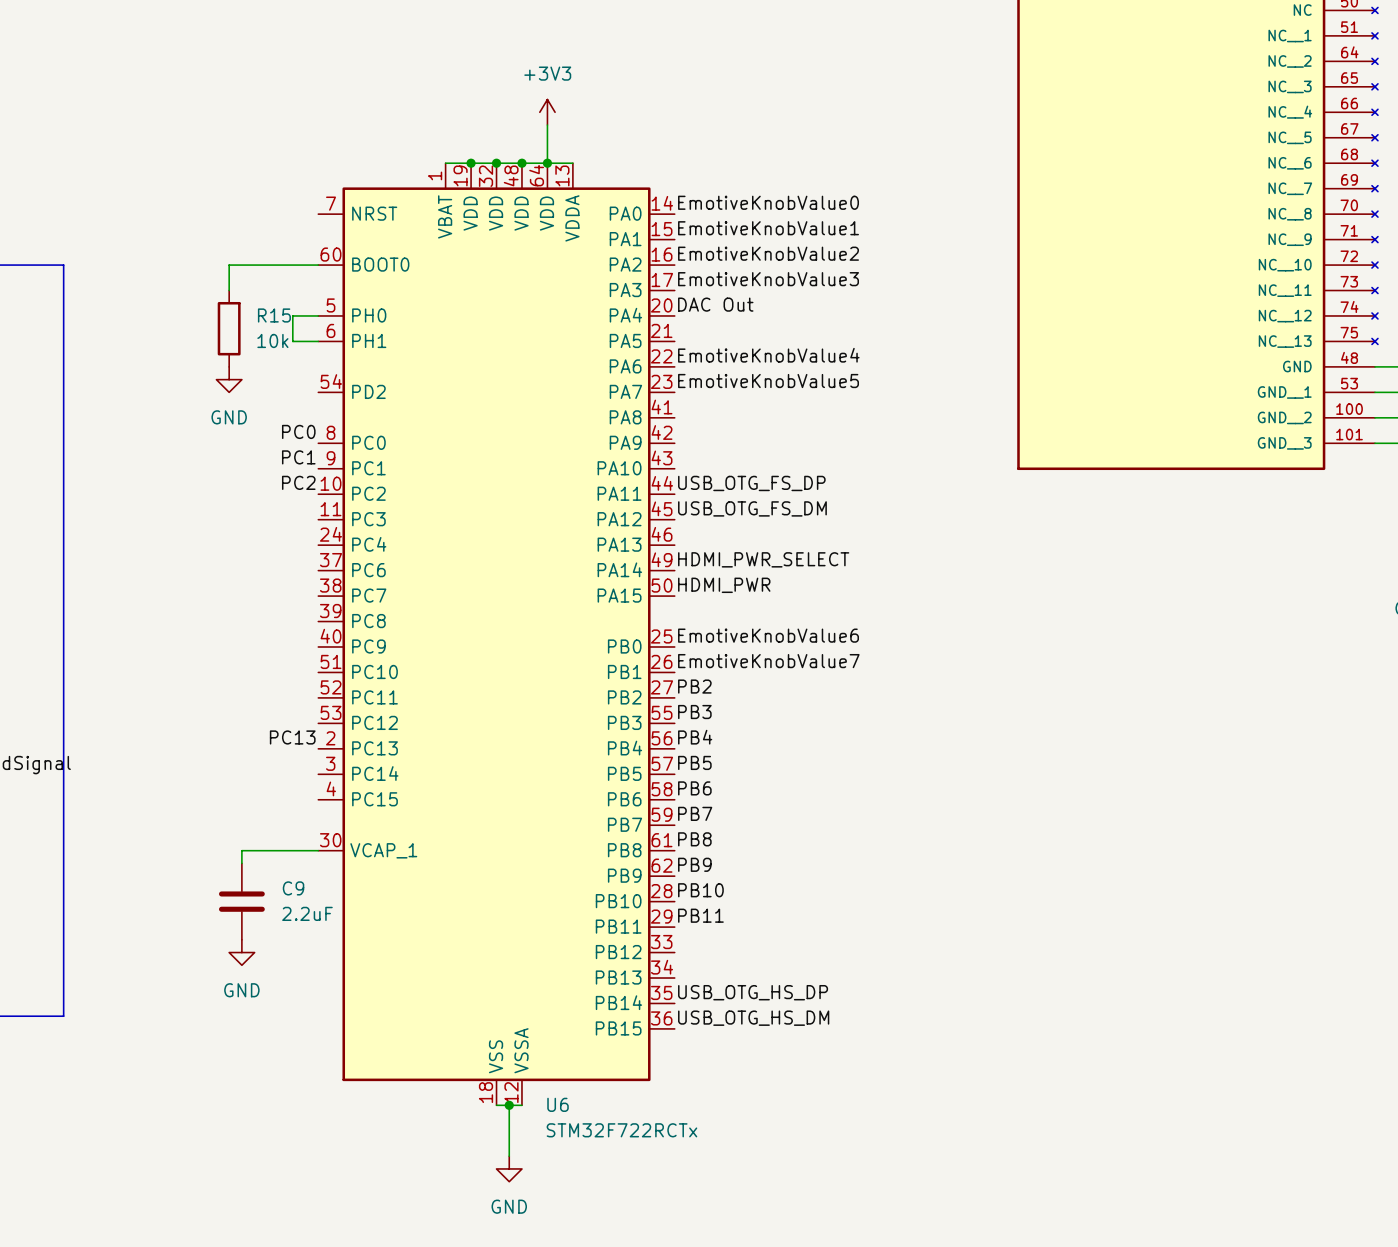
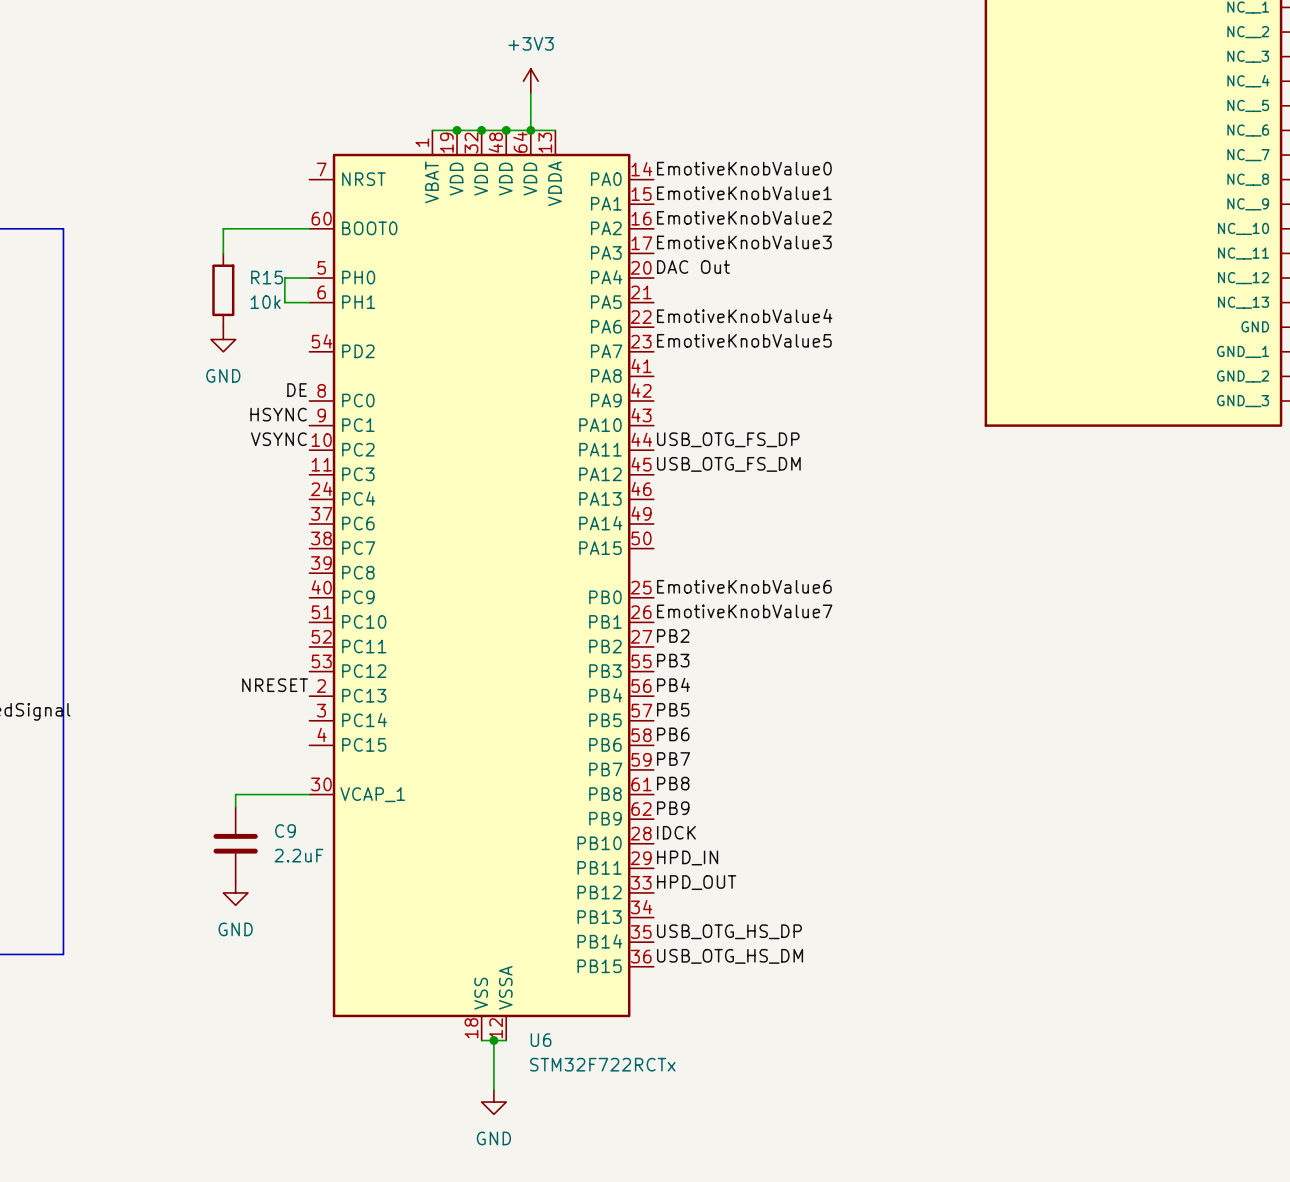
label: PC0 (298, 431) -> DE (297, 390)
label: PC1 (298, 457) -> HSYNC (278, 414)
label: PC2 (298, 482) -> VSYNC (278, 439)
label: HDMI_PWR_SELECT (763, 559) -> none
label: HDMI_PWR (724, 585) -> none
label: PC13 (292, 737) -> NRESET (275, 685)
label: PB10 (700, 890) -> IDCK (676, 832)
label: PB11 (700, 915) -> HPD_IN (687, 857)
label: none -> HPD_OUT (696, 882)

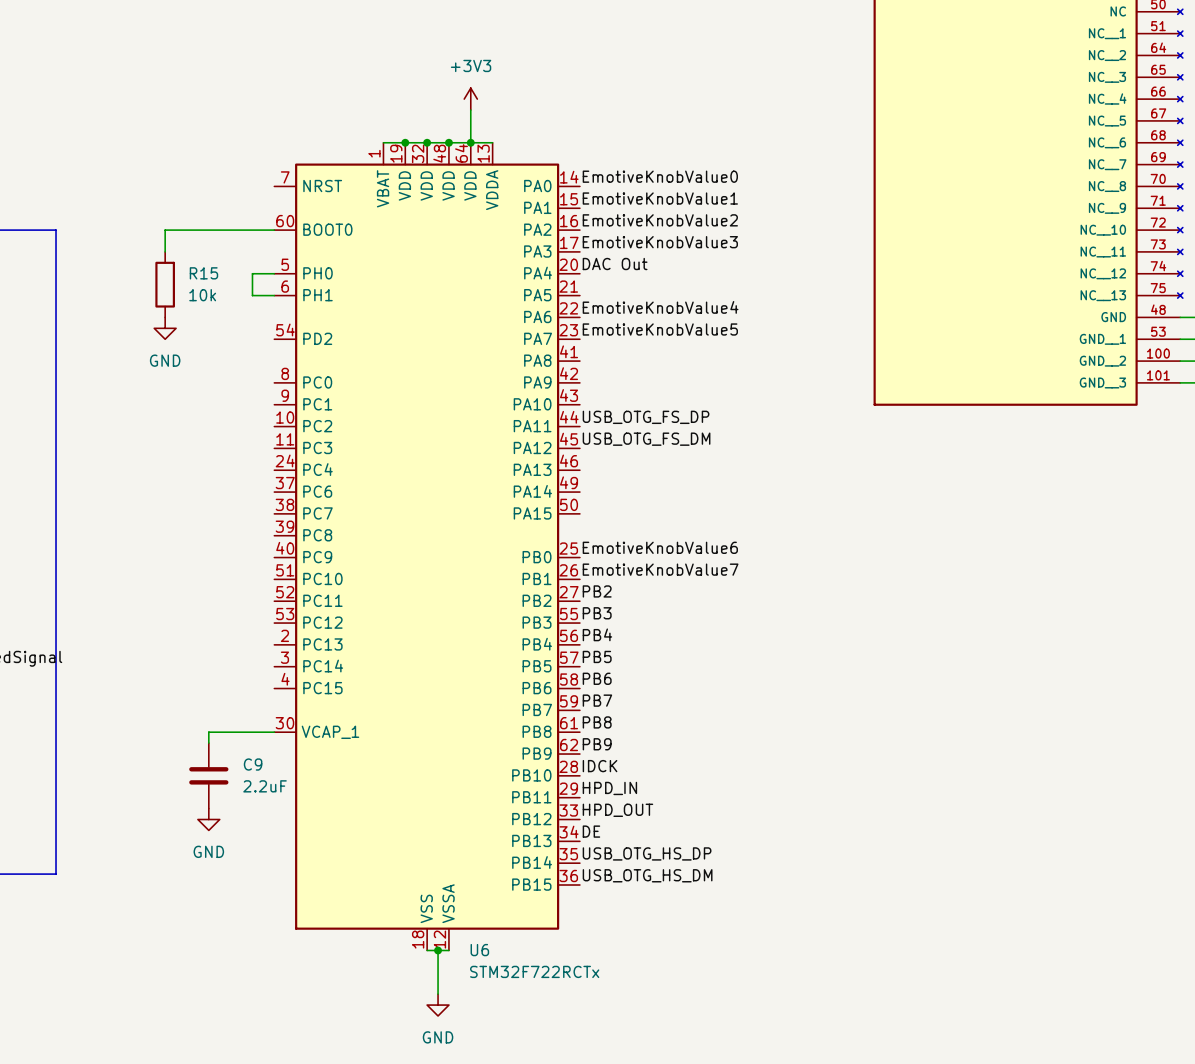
wire: (223, 228) (223, 253) -> (197, 230) (165, 230) (165, 251)
R15 position: (223, 290) -> (165, 284)
power symbol position: GND (223, 339) -> GND (165, 328)
label: DE (297, 390) -> none
label: HSYNC (278, 414) -> none
label: VSYNC (278, 439) -> none
label: NRESET (275, 685) -> none
label: none -> DE (591, 831)

